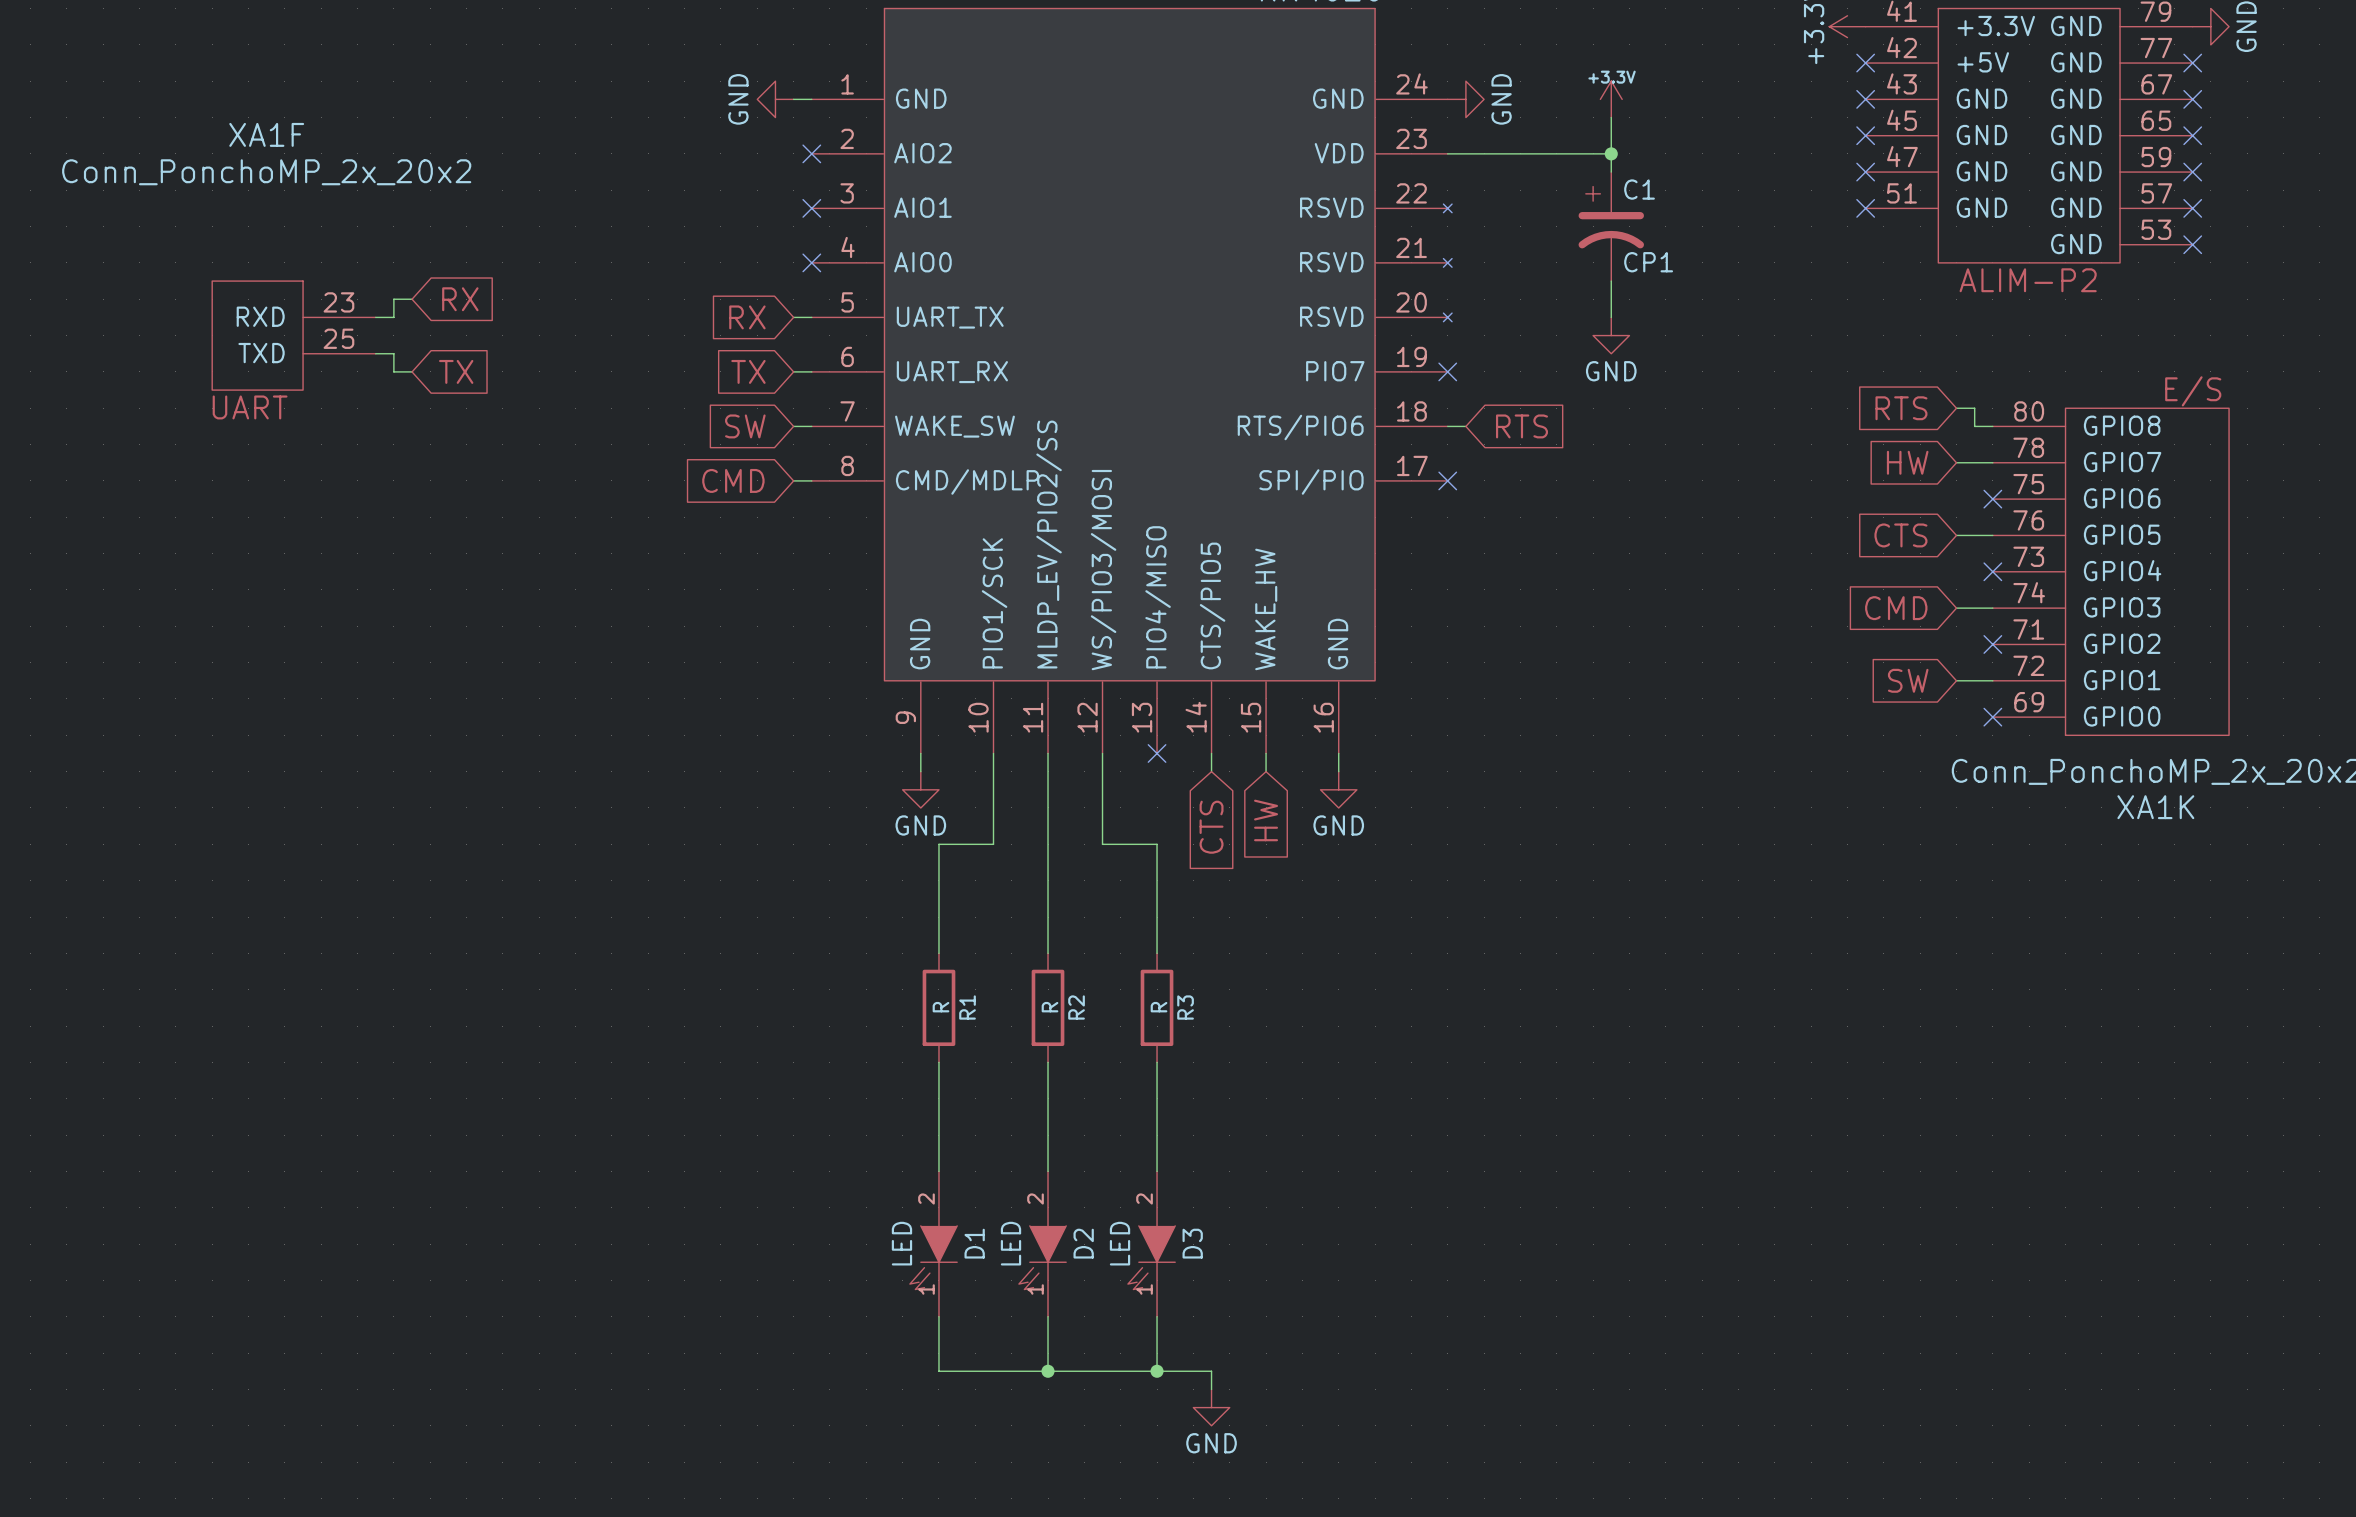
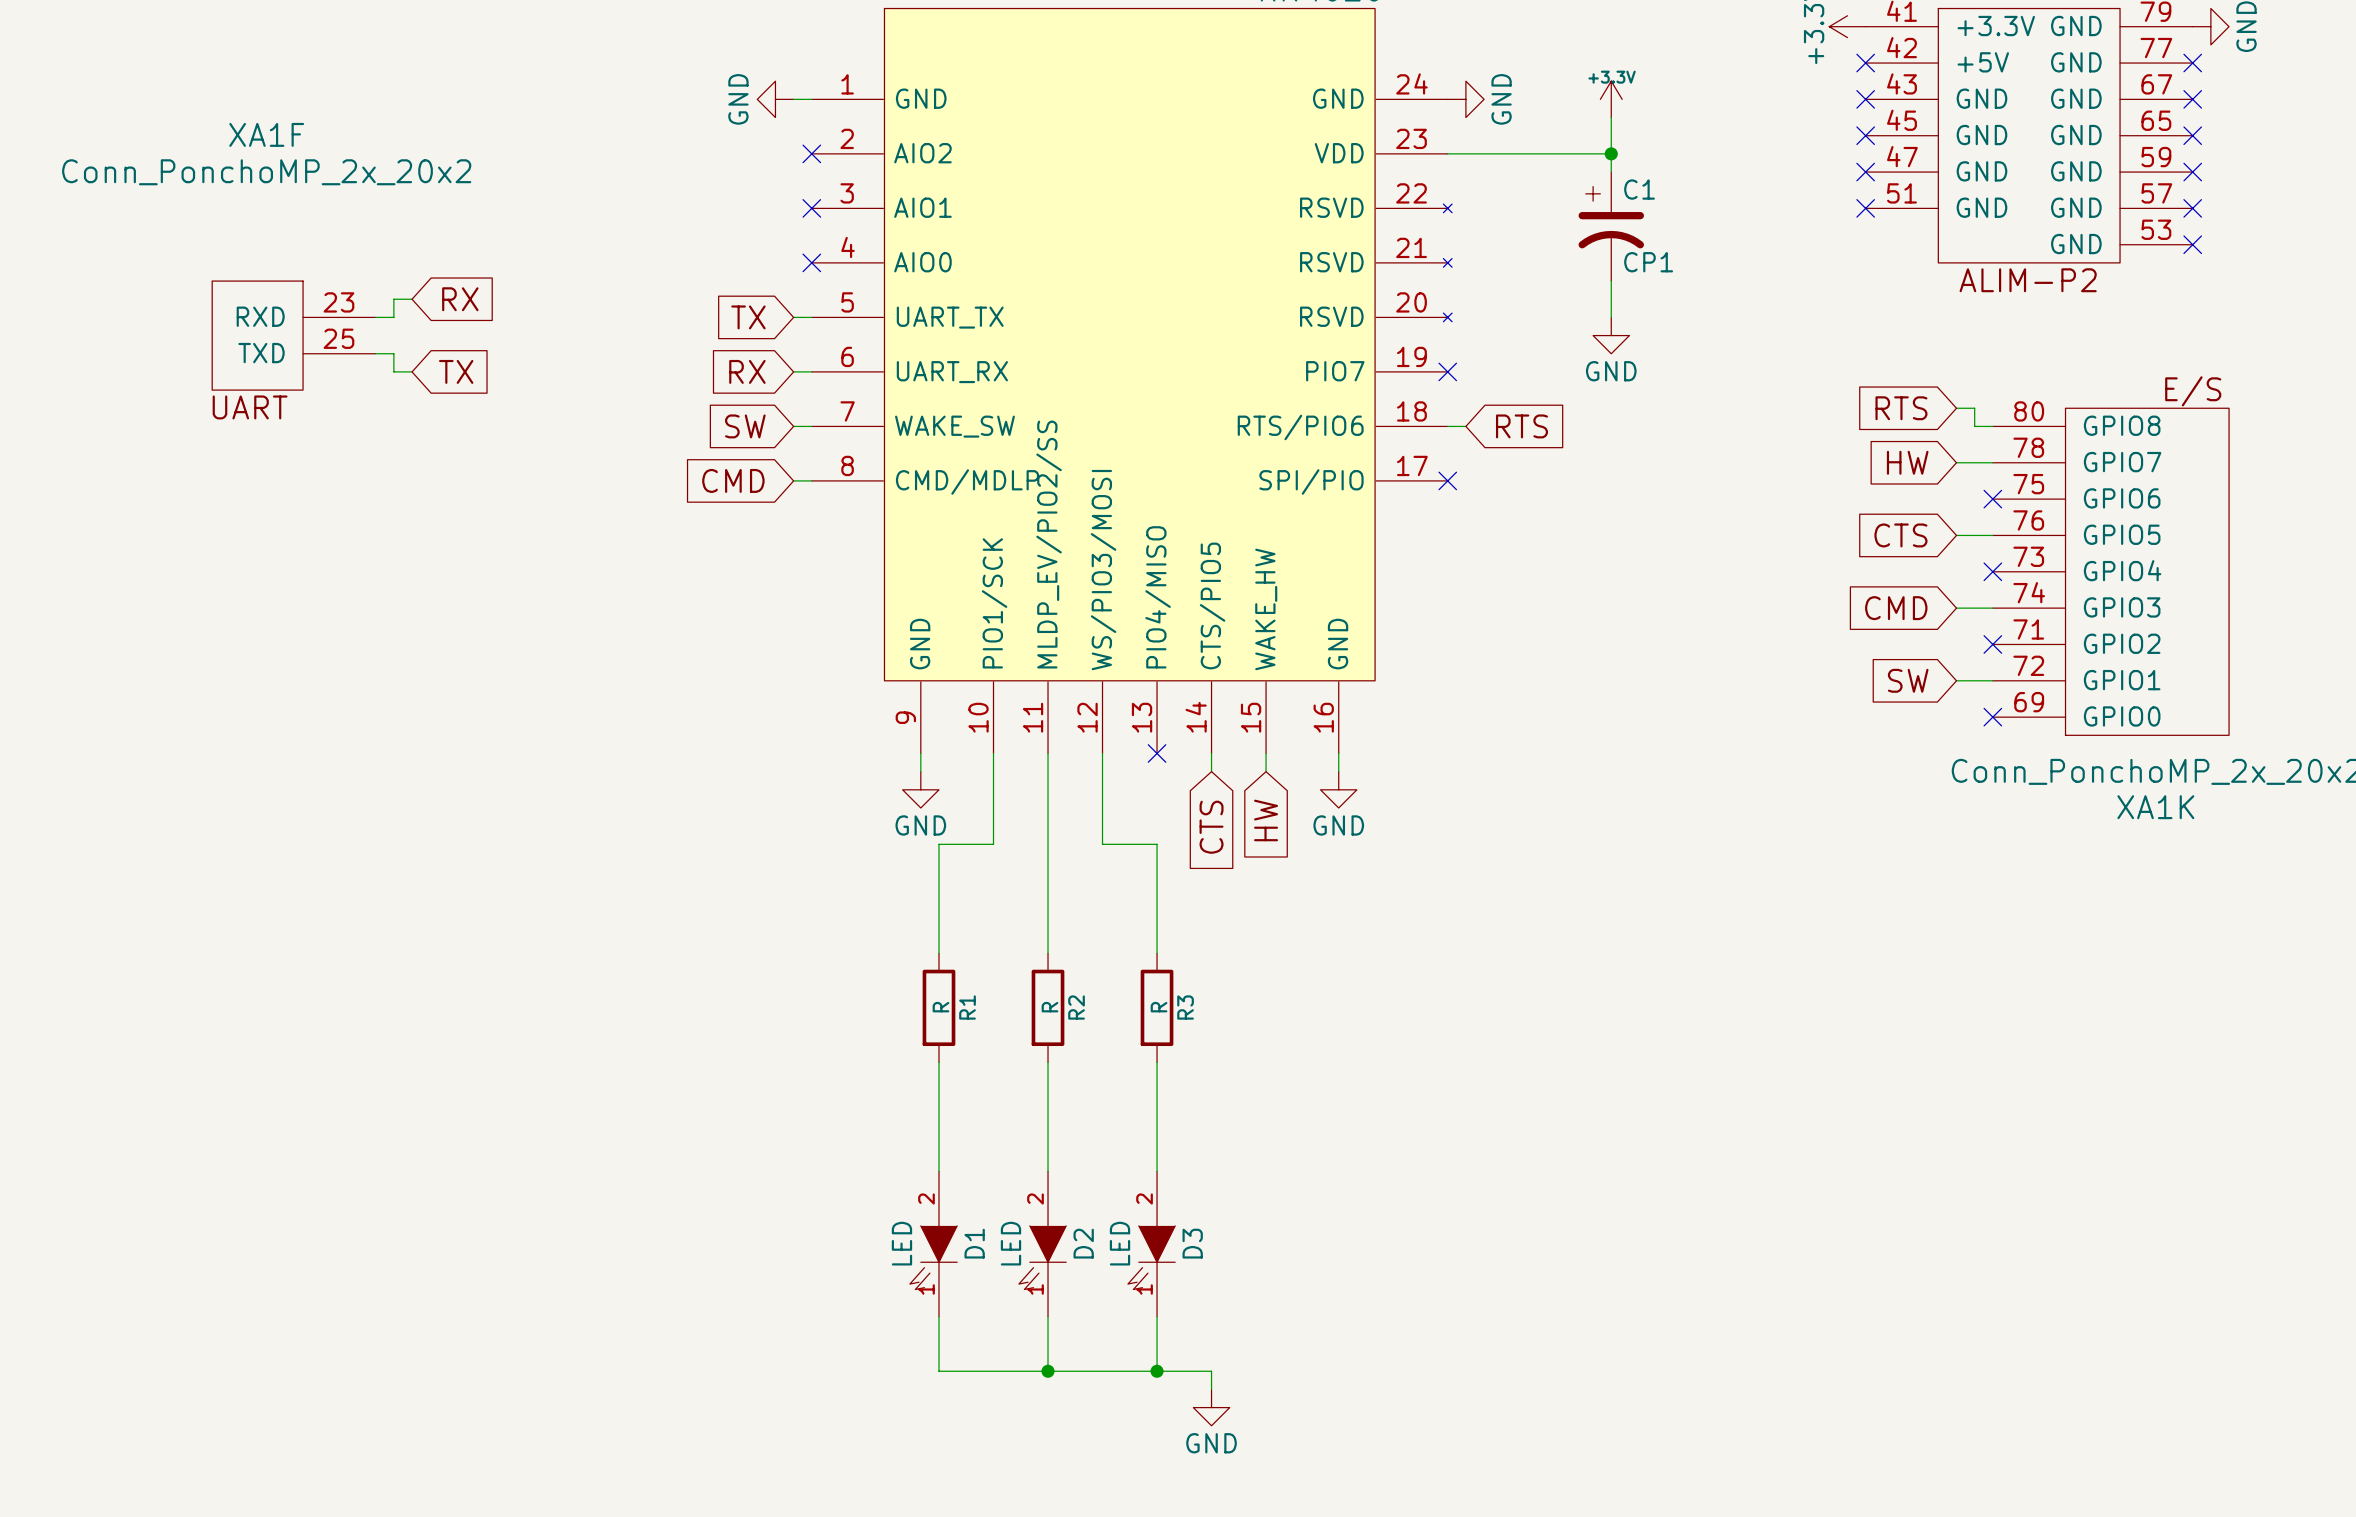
global label: RX (747, 317) -> TX (748, 317)
global label: TX (748, 371) -> RX (747, 371)

